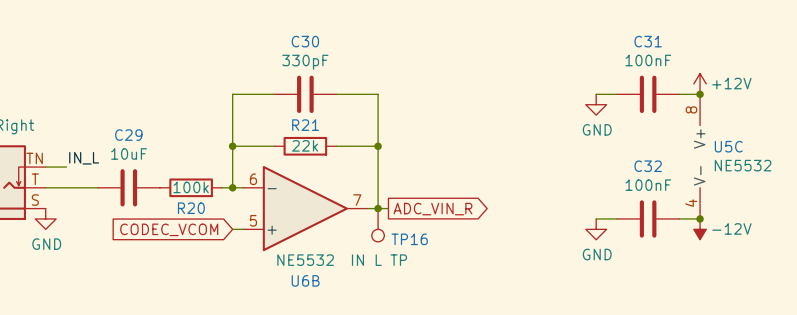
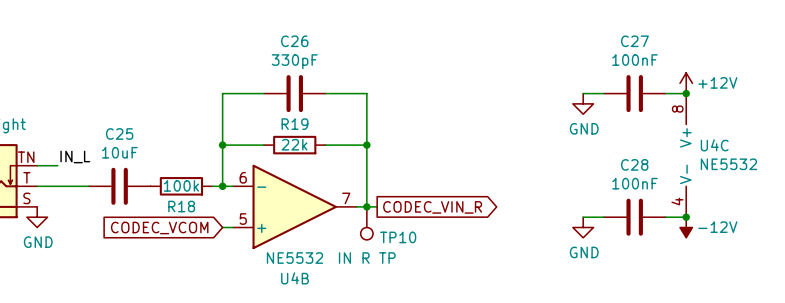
C30 name: C30 (305, 41) -> C26 (294, 41)
C31 name: C31 (648, 41) -> C27 (634, 41)
R21 name: R21 (305, 125) -> R19 (294, 124)
C29 name: C29 (128, 135) -> C25 (119, 134)
U5C name: U5C (728, 146) -> U4C (714, 145)
C32 name: C32 (648, 166) -> C28 (634, 164)
R20 name: R20 (191, 208) -> R18 (181, 206)
global label: ADC_VIN_R (432, 209) -> CODEC_VIN_R (432, 207)
TP16 name: TP16 (409, 239) -> TP10 (398, 237)
TP16 value: IN L TP (379, 260) -> IN R TP (367, 258)
U6B name: U6B (305, 280) -> U4B (294, 278)

